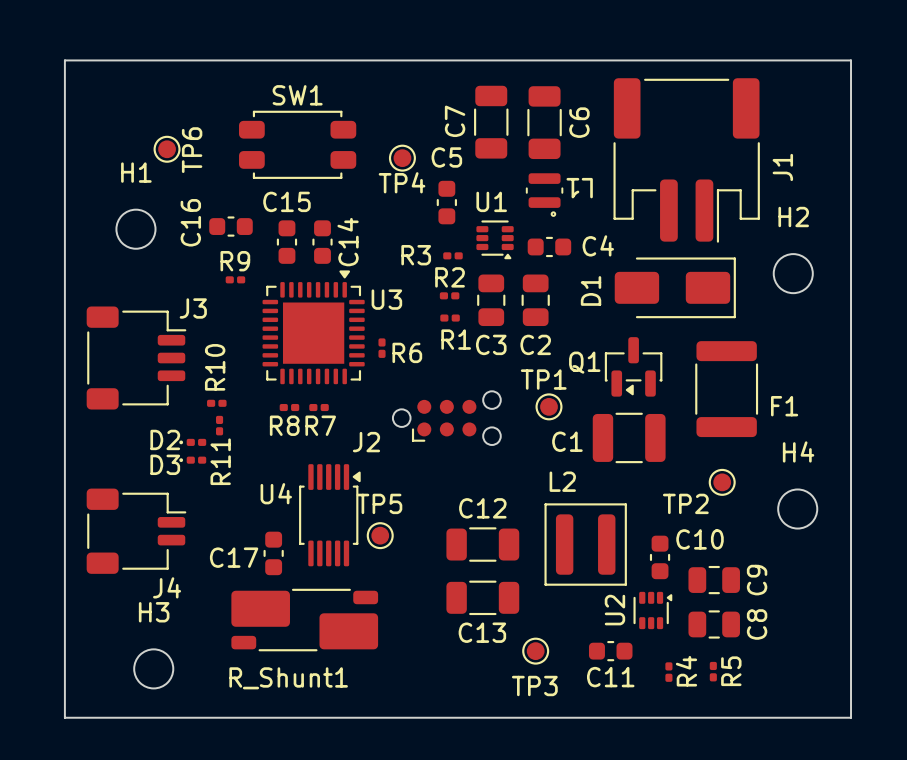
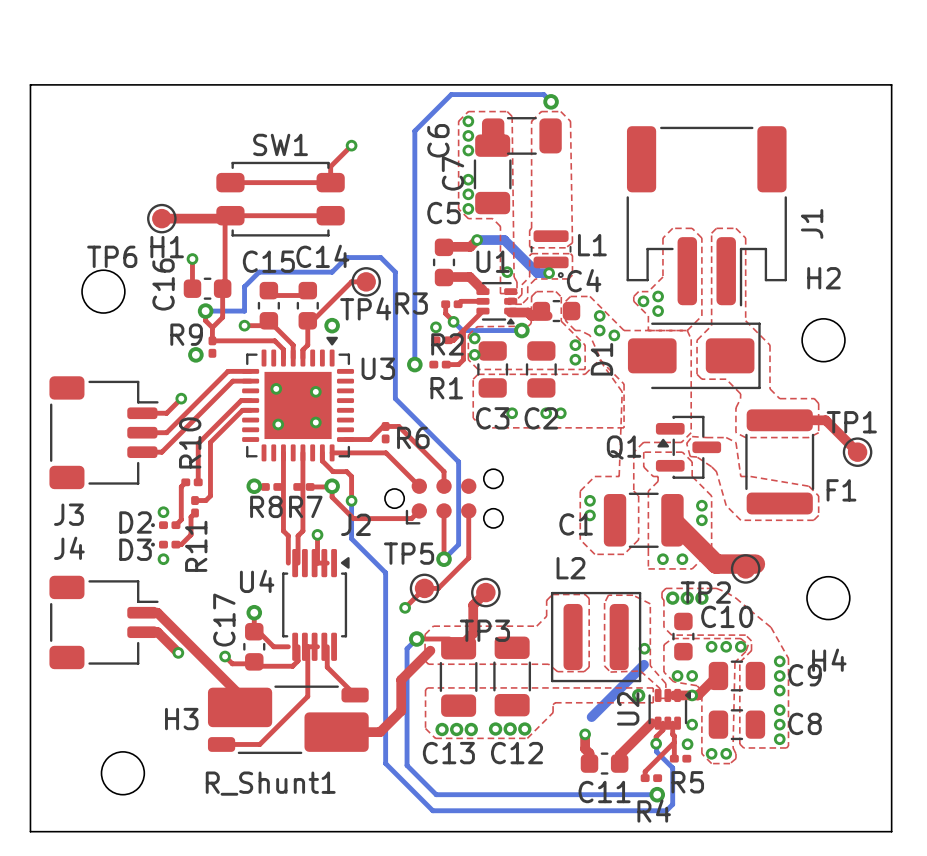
bottom track: none -> (551, 101) (543, 94) (451, 94) (414, 131) (414, 364)
via: none -> (551, 101)
board edge: (64, 60) (851, 60) (851, 717) (64, 717) (64, 60) -> (30, 84) (30, 831) (891, 831) (891, 84) (30, 84)
top zone outline: none -> (468, 111) (458, 121) (458, 208) (468, 218) (492, 218) (500, 226) (500, 293) (517, 293) (517, 281) (514, 277) (512, 116) (507, 111) (468, 111)
top zone outline: none -> (541, 111) (560, 111) (570, 121) (572, 242) (565, 247) (529, 246) (529, 230) (531, 228) (531, 121) (541, 111)
via: none -> (468, 121)
via: none -> (468, 135)
top track: none -> (351, 145) (330, 166) (330, 182) (230, 182)
via: none -> (351, 145)
via: none -> (468, 150)
C6 rotation: 0° (544, 122) -> 90° clockwise (521, 135)
C6 position: (544, 122) -> (521, 135)
C6 name position: C6 (579, 122) -> C6 (438, 140)
via: none -> (468, 179)
via: none -> (468, 194)
TP6 position: (167, 149) -> (161, 218)
TP6 name rotation: 0° (192, 150) -> 90° clockwise (112, 256)
TP6 name position: TP6 (192, 150) -> TP6 (112, 256)
via: none -> (468, 208)
TP4 position: (402, 158) -> (366, 281)
top track: none -> (230, 215) (227, 218) (161, 218)
top track: none -> (230, 215) (225, 221) (222, 317) (212, 327)
top track: none -> (230, 215) (330, 215)
top zone outline: none -> (716, 228) (711, 233) (711, 325) (697, 340) (697, 374) (701, 379) (726, 379) (740, 393) (735, 407) (735, 432) (745, 437) (808, 437) (818, 432) (818, 403) (814, 398) (779, 398) (770, 388) (770, 345) (745, 320) (745, 238) (735, 228) (716, 228)
H1 name position: H1 (136, 172) -> H1 (167, 247)
top track: none -> (477, 240) (470, 246) (453, 246)
bottom track: none -> (477, 240) (504, 240) (537, 273) (549, 273)
via: none -> (477, 240)
L1 name rotation: 0° (579, 188) -> 180° (592, 245)
top zone outline: none -> (531, 253) (529, 255) (529, 277) (521, 284) (521, 294) (517, 298) (508, 298) (508, 304) (521, 304) (527, 298) (527, 286) (535, 278) (568, 278) (572, 275) (572, 255) (570, 253) (531, 253)
top track: none -> (192, 259) (192, 282)
via: none -> (192, 259)
via: none -> (507, 272)
via: none -> (549, 273)
top track: none -> (453, 277) (469, 277) (482, 290)
top track: none -> (366, 281) (351, 281) (307, 325) (307, 345) (302, 349) (302, 358)
top zone outline: none -> (536, 291) (555, 291) (561, 296) (561, 321) (585, 345) (585, 369) (478, 369) (468, 359) (468, 335) (477, 326) (528, 326) (531, 323) (531, 296) (536, 291)
top track: none -> (273, 295) (307, 295)
via: none -> (658, 296)
top track: none -> (482, 301) (461, 301) (458, 304)
via: none -> (643, 301)
top track: none -> (445, 304) (445, 313) (453, 321)
C14 name rotation: 0° (348, 242) -> 90° clockwise (322, 256)
C4 name position: C4 (598, 245) -> C4 (584, 280)
top track: none -> (205, 311) (205, 320) (212, 327)
bottom track: none -> (205, 311) (244, 311) (244, 286) (259, 272) (332, 272) (346, 257) (380, 257) (395, 272) (395, 398) (458, 461) (458, 544) (444, 559)
via: none -> (205, 311)
top track: none -> (482, 311) (453, 340) (448, 340)
via: none -> (658, 311)
top track: none -> (510, 312) (528, 312) (531, 315) (547, 315)
via: none -> (599, 315)
R3 position: (452, 255) -> (451, 304)
bottom track: none -> (453, 321) (462, 330) (521, 330)
via: none -> (453, 321)
top track: none -> (244, 325) (273, 325) (293, 345) (293, 358)
via: none -> (244, 325)
via: none -> (332, 325)
via: none -> (435, 327)
top track: none -> (212, 327) (212, 340) (274, 340) (283, 349) (283, 358)
top track: none -> (463, 330) (463, 359) (458, 364) (446, 364)
via: none -> (521, 330)
via: none -> (599, 330)
top zone outline: none -> (648, 330) (648, 315) (633, 301) (633, 296) (638, 291) (648, 291) (662, 277) (662, 238) (672, 228) (692, 228) (701, 238) (701, 315) (687, 330)
top zone outline: none -> (687, 330) (624, 330) (589, 296) (570, 296) (565, 301) (565, 320) (575, 330) (580, 330) (589, 335) (603, 365) (622, 391) (619, 476) (594, 476) (580, 491) (580, 539) (594, 554) (624, 554) (638, 539) (638, 495) (633, 491) (633, 452) (643, 442) (681, 442) (691, 432) (691, 339) (687, 330)
via: none -> (614, 335)
via: none -> (474, 338)
via: none -> (575, 345)
R9 rotation: 0° (235, 279) -> 90° clockwise (212, 347)
via: none -> (195, 354)
via: none -> (474, 354)
via: none -> (575, 359)
top zone outline: none -> (599, 359) (585, 374) (478, 374) (473, 379) (473, 418) (482, 427) (624, 427) (624, 384) (599, 359)
via: none -> (414, 364)
R2 position: (449, 295) -> (442, 340)
top track: none -> (250, 371) (228, 371) (166, 432) (142, 432)
J3 name position: J3 (193, 308) -> J3 (68, 514)
top track: none -> (250, 381) (232, 381) (161, 452) (142, 452)
via: none -> (276, 388)
R1 position: (450, 318) -> (440, 364)
via: none -> (315, 391)
top track: none -> (181, 398) (166, 413) (142, 413)
via: none -> (181, 398)
top track: none -> (250, 400) (241, 400) (198, 443) (198, 482)
top track: none -> (250, 410) (242, 410) (210, 442) (210, 495) (205, 500) (195, 500)
via: none -> (512, 413)
via: none -> (546, 413)
via: none -> (560, 413)
top track: none -> (779, 420) (825, 420) (857, 452)
via: none -> (315, 422)
R6 position: (382, 348) -> (385, 432)
via: none -> (278, 424)
top zone outline: none -> (692, 436) (686, 443) (690, 456) (697, 457) (716, 471) (726, 505) (740, 520) (813, 520) (818, 515) (818, 495) (808, 486) (740, 476) (735, 442) (726, 437) (692, 436)
top track: none -> (345, 439) (370, 439) (383, 426) (398, 426) (444, 471) (444, 486)
Q1 rotation: 0° (633, 366) -> 90° clockwise (688, 447)
Q1 position: (633, 366) -> (688, 447)
top zone outline: none -> (643, 452) (682, 452) (692, 461) (692, 476) (711, 495) (711, 549) (692, 568) (648, 568) (648, 491) (658, 481) (658, 476) (653, 476) (643, 467) (643, 452)
top track: none -> (283, 452) (283, 530) (288, 535) (288, 563)
top track: none -> (302, 452) (302, 530) (298, 535) (298, 563)
top track: none -> (322, 452) (322, 461) (333, 471) (346, 471) (351, 476) (351, 500)
top track: none -> (332, 452) (385, 452) (419, 486)
F1 position: (726, 389) -> (779, 461)
top track: none -> (185, 482) (181, 486) (181, 519) (175, 525)
via: none -> (254, 486)
via: none -> (332, 486)
TP1 position: (549, 406) -> (857, 452)
F1 name position: F1 (784, 406) -> F1 (841, 490)
top track: none -> (315, 486) (332, 486) (332, 497) (353, 518) (411, 518) (419, 510)
bottom track: none -> (351, 500) (351, 538) (385, 572) (385, 763) (432, 810) (666, 810) (672, 804) (672, 767) (656, 751) (656, 743)
via: none -> (351, 500)
via: none -> (589, 500)
via: none -> (701, 505)
top track: none -> (444, 510) (444, 559)
top track: none -> (468, 510) (468, 557) (438, 588) (424, 588) (405, 607)
via: none -> (163, 512)
top track: none -> (195, 512) (191, 516) (191, 534) (181, 544) (175, 544)
via: none -> (589, 515)
top track: none -> (672, 520) (716, 564) (755, 564)
via: none -> (701, 520)
top track: none -> (317, 534) (317, 563) (327, 563)
via: none -> (317, 534)
H4 name position: H4 (798, 451) -> H4 (829, 660)
via: none -> (163, 559)
via: none -> (444, 559)
via: none -> (662, 559)
via: none -> (682, 559)
top zone outline: none -> (665, 588) (661, 592) (663, 600) (663, 627) (671, 635) (745, 635) (751, 640) (751, 650) (739, 662) (739, 744) (743, 747) (786, 747) (788, 746) (788, 658) (770, 627) (735, 598) (716, 588) (665, 588)
TP5 name position: TP5 (379, 503) -> TP5 (409, 553)
top track: none -> (485, 592) (473, 605) (473, 633) (458, 648)
top zone outline: none -> (552, 594) (546, 600) (546, 616) (536, 626) (433, 626) (425, 634) (425, 660) (428, 664) (548, 664) (557, 671) (584, 671) (589, 667) (589, 598) (585, 594) (552, 594)
top zone outline: none -> (608, 595) (633, 595) (650, 603) (650, 665) (665, 683) (665, 698) (660, 698) (660, 688) (640, 671) (610, 672) (604, 666) (604, 603) (608, 595)
C12 name position: C12 (482, 508) -> C12 (517, 753)
via: none -> (672, 598)
via: none -> (687, 598)
via: none -> (701, 598)
via: none -> (405, 607)
top track: none -> (142, 612) (157, 612) (240, 695) (240, 707)
top track: none -> (254, 612) (254, 633) (260, 633) (273, 646) (288, 646)
via: none -> (254, 612)
TP5 position: (380, 535) -> (424, 588)
top track: none -> (142, 632) (157, 632) (178, 652)
C12 rotation: 0° (482, 544) -> 90° clockwise (512, 676)
C12 position: (482, 544) -> (512, 676)
top zone outline: none -> (672, 638) (663, 644) (663, 672) (673, 681) (697, 685) (701, 690) (701, 753) (711, 763) (730, 763) (735, 758) (733, 747) (734, 662) (745, 651) (748, 644) (740, 638) (672, 638)
top track: none -> (416, 639) (449, 639)
bottom track: none -> (416, 639) (407, 648) (407, 765) (436, 794) (657, 794)
via: none -> (416, 639)
top track: none -> (298, 646) (298, 660) (292, 666) (232, 663) (225, 656)
top track: none -> (317, 646) (307, 646) (307, 696) (259, 744) (221, 744)
top track: none -> (327, 646) (327, 667) (355, 695)
via: none -> (711, 646)
via: none -> (726, 646)
via: none -> (740, 646)
via: none -> (644, 648)
top track: none -> (430, 650) (401, 679) (401, 711) (380, 732) (336, 732)
C17 name rotation: 0° (234, 557) -> 90° counterclockwise (224, 620)
C10 position: (660, 557) -> (683, 636)
via: none -> (178, 652)
via: none -> (225, 656)
via: none -> (779, 661)
bottom track: none -> (644, 664) (591, 717)
via: none -> (677, 675)
via: none -> (692, 675)
top track: none -> (717, 675) (698, 695) (674, 695)
via: none -> (779, 675)
C9 name rotation: 0° (757, 580) -> 90° clockwise (805, 675)
J4 name position: J4 (167, 587) -> J4 (69, 548)
top zone outline: none -> (427, 687) (653, 687) (653, 702) (555, 702) (553, 704) (553, 712) (527, 738) (435, 738) (425, 728) (425, 689) (427, 687)
via: none -> (779, 690)
C13 rotation: 0° (482, 597) -> 90° clockwise (458, 676)
via: none -> (638, 695)
via: none -> (692, 695)
via: none -> (779, 710)
H3 name position: H3 (154, 612) -> H3 (181, 719)
top track: none -> (651, 723) (619, 755) (619, 763)
top track: none -> (662, 723) (662, 730) (656, 736) (656, 743)
top track: none -> (672, 723) (674, 758)
via: none -> (692, 724)
via: none -> (779, 724)
C8 name rotation: 0° (757, 624) -> 90° clockwise (805, 723)
via: none -> (442, 729)
via: none -> (456, 729)
via: none -> (471, 729)
via: none -> (495, 729)
via: none -> (510, 729)
via: none -> (524, 729)
C13 name position: C13 (482, 632) -> C13 (448, 753)
top track: none -> (585, 734) (585, 748) (589, 753) (589, 763)
via: none -> (585, 734)
via: none -> (779, 739)
top track: none -> (674, 742) (645, 771) (645, 778)
via: none -> (656, 743)
via: none -> (687, 744)
TP3 position: (535, 651) -> (485, 592)
C11 position: (610, 651) -> (604, 763)
via: none -> (711, 753)
via: none -> (726, 753)
R5 rotation: 0° (713, 671) -> 90° clockwise (680, 758)
R5 position: (713, 671) -> (680, 758)
R4 rotation: 0° (668, 672) -> 90° clockwise (651, 778)
R4 position: (668, 672) -> (651, 778)
via: none -> (657, 794)

